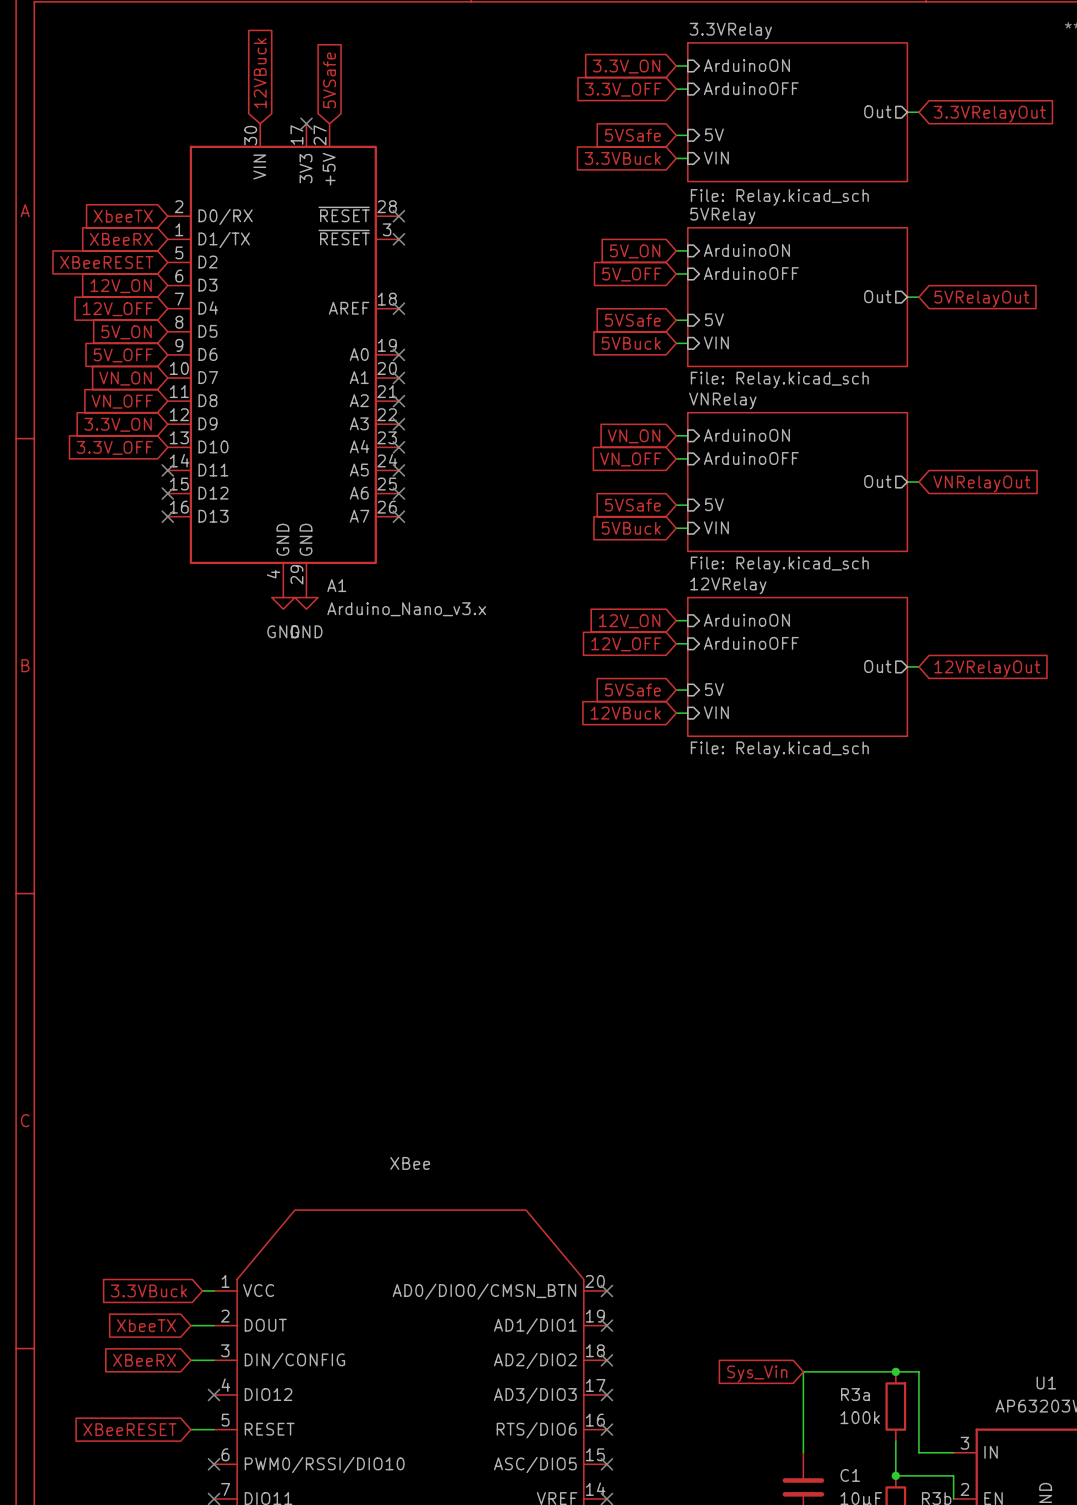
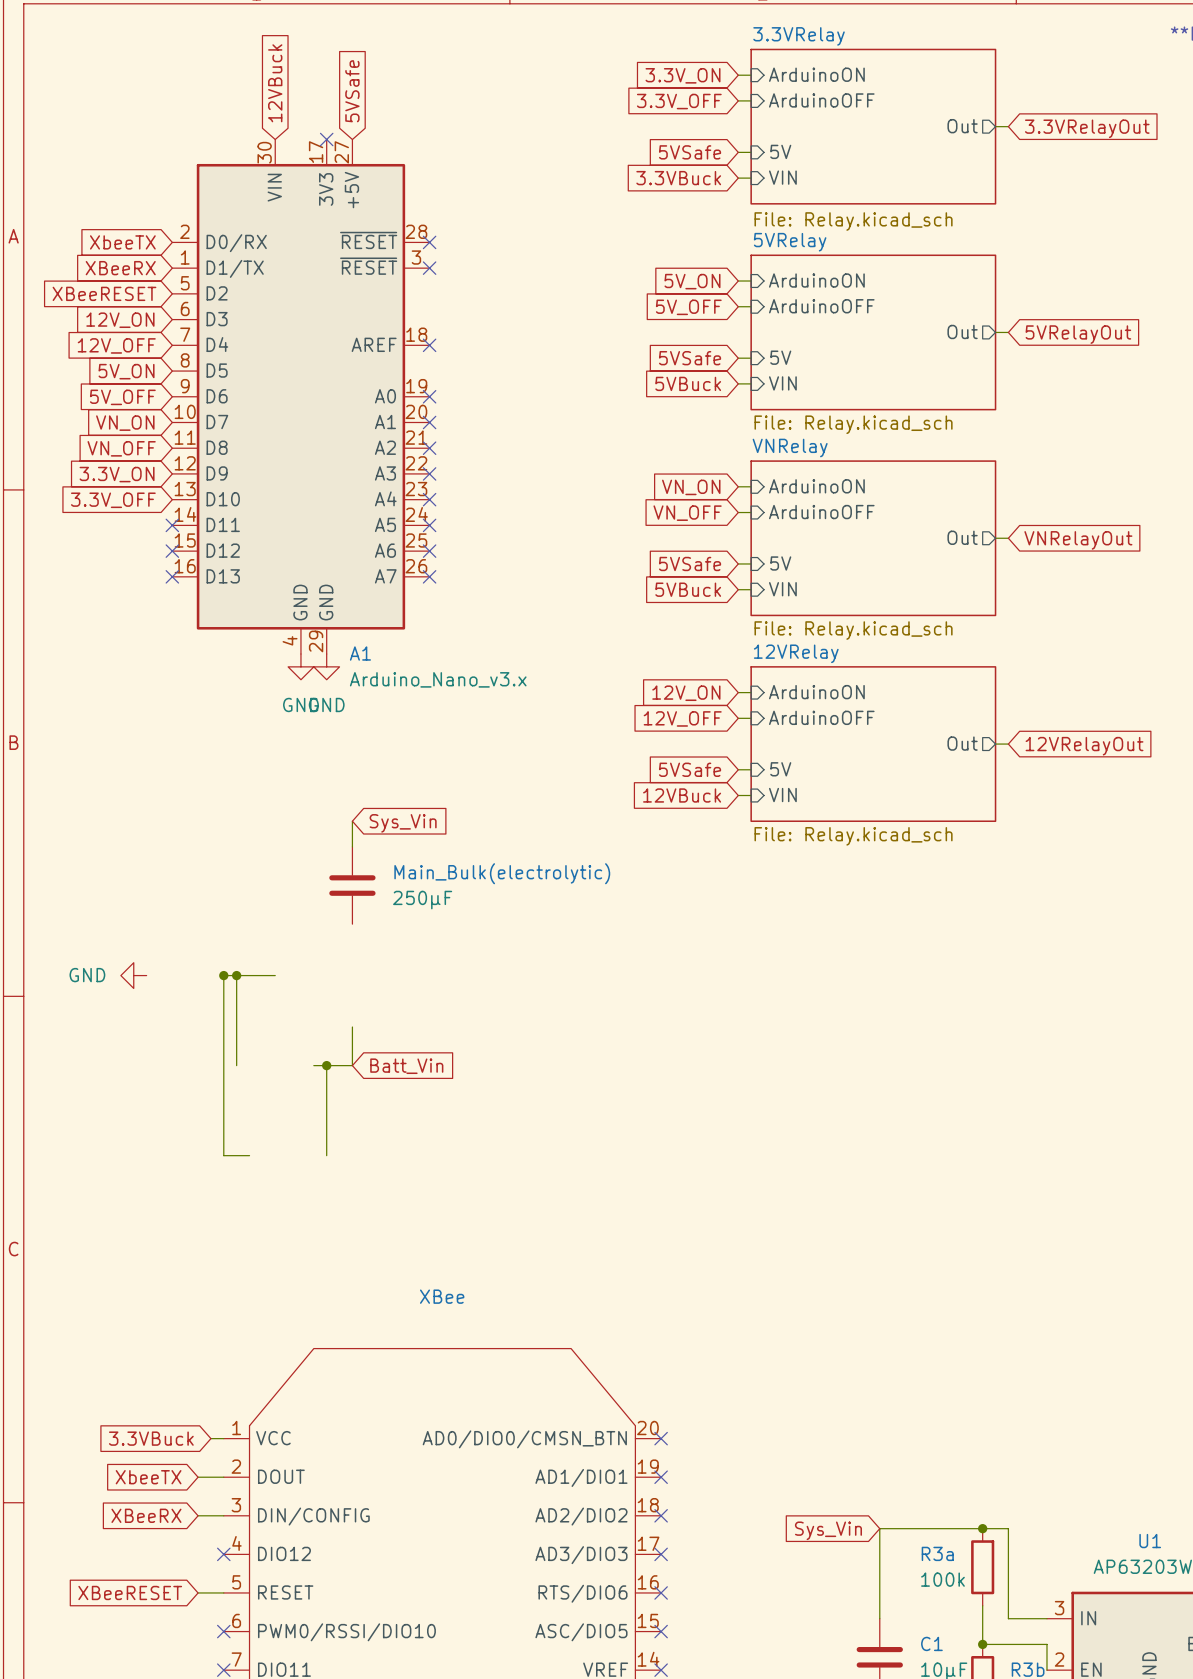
wire: none -> (352, 821) (352, 846)
global label: none -> Sys_Vin (403, 823)
Main_Bulk(electrolytic): none -> 250µF (352, 885)
power symbol: none -> GND (133, 975)
junction: none -> (223, 975)
wire: none -> (236, 975) (236, 1065)
junction: none -> (236, 975)
wire: none -> (275, 975) (223, 975) (223, 1155) (249, 1155)
wire: none -> (352, 1027) (352, 1065) (313, 1065)
wire: none -> (326, 1065) (326, 1155)
junction: none -> (326, 1065)
global label: none -> Batt_Vin (406, 1066)

